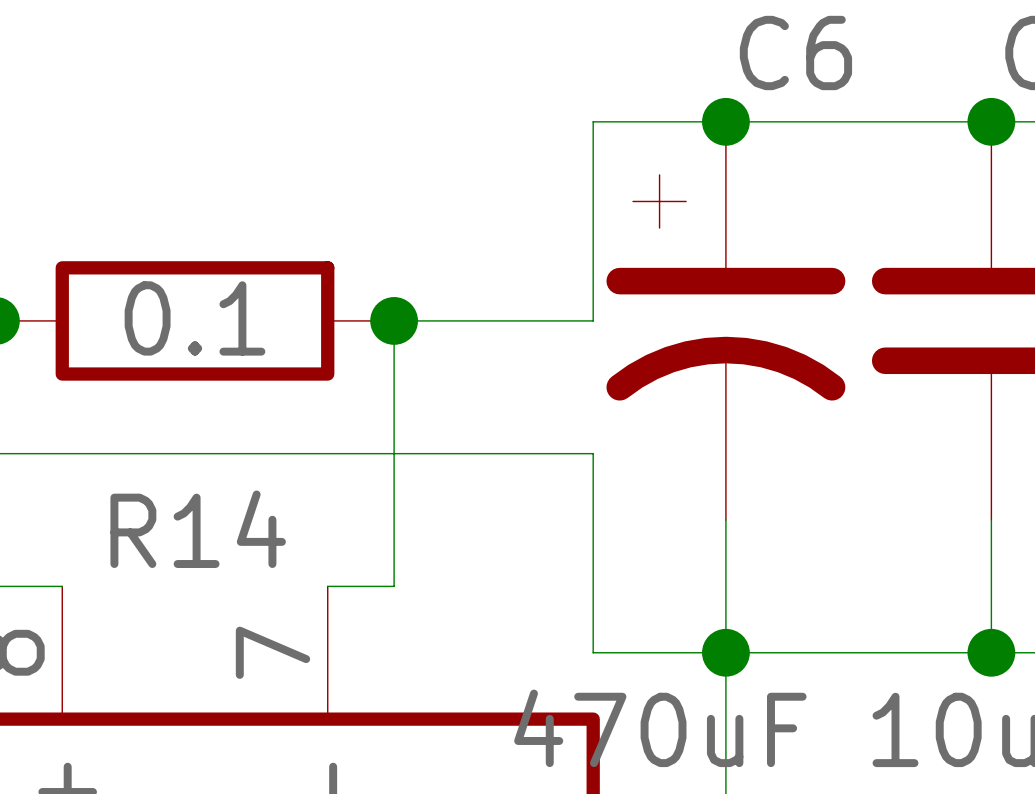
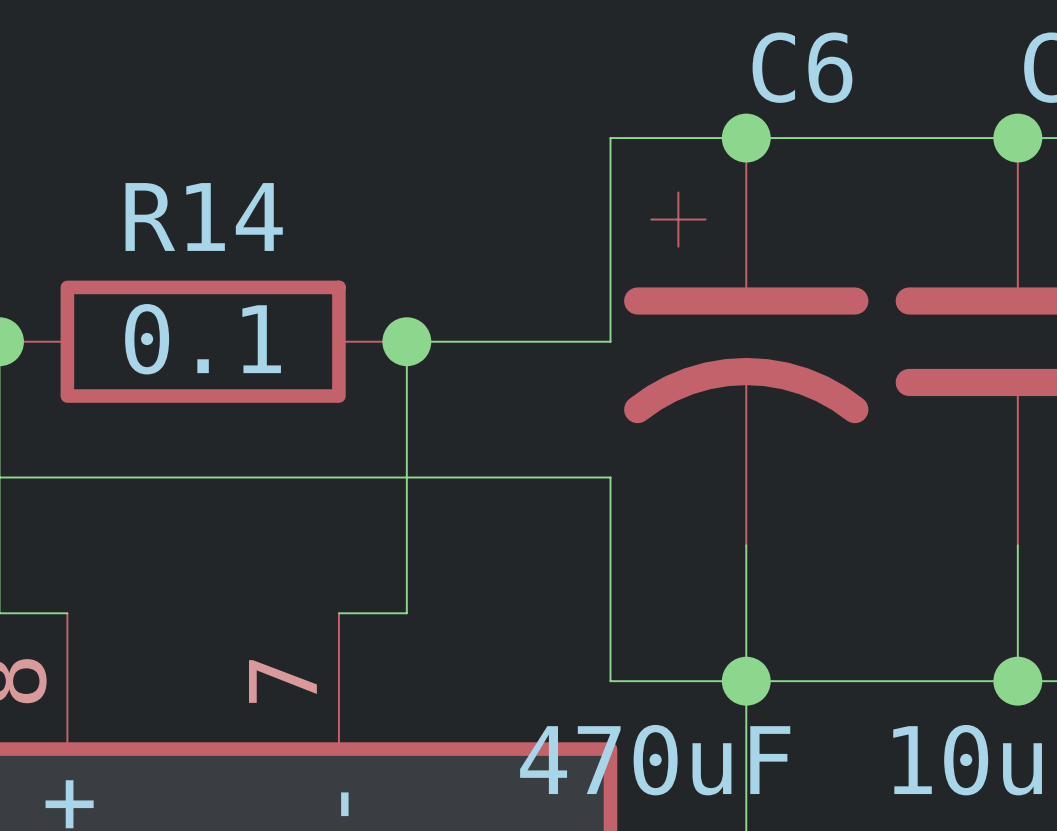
R14 name position: R14 (198, 529) -> R14 (204, 216)

